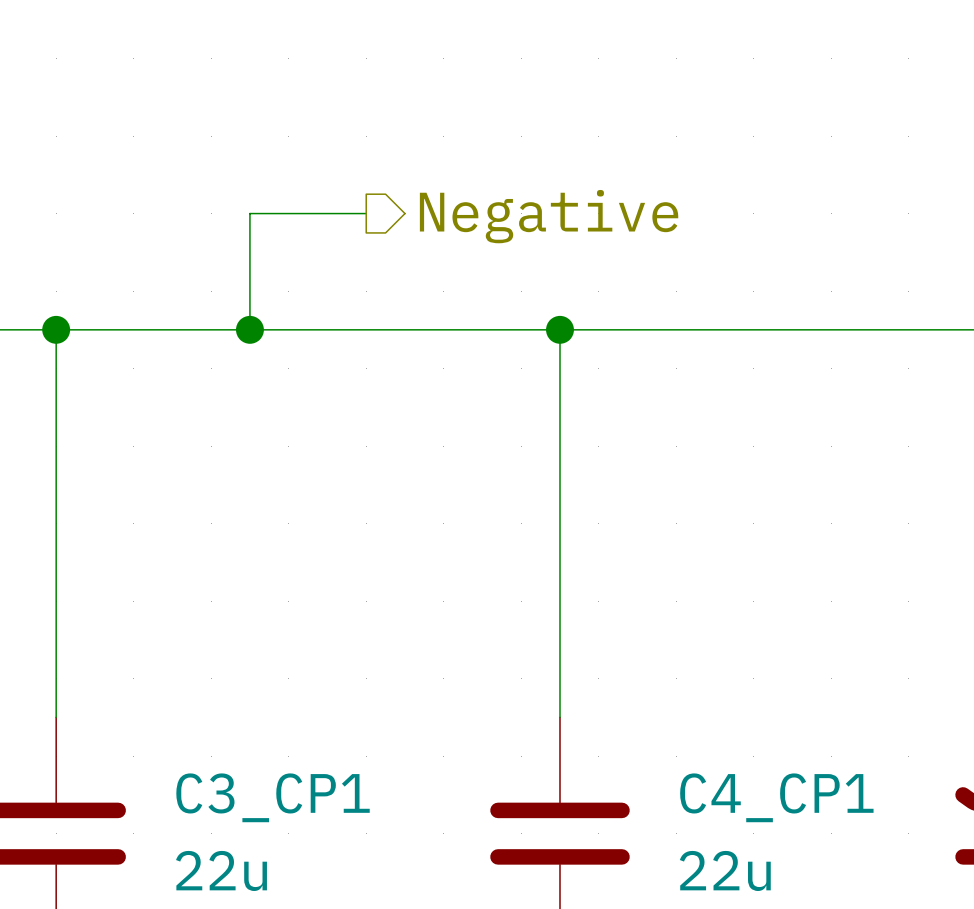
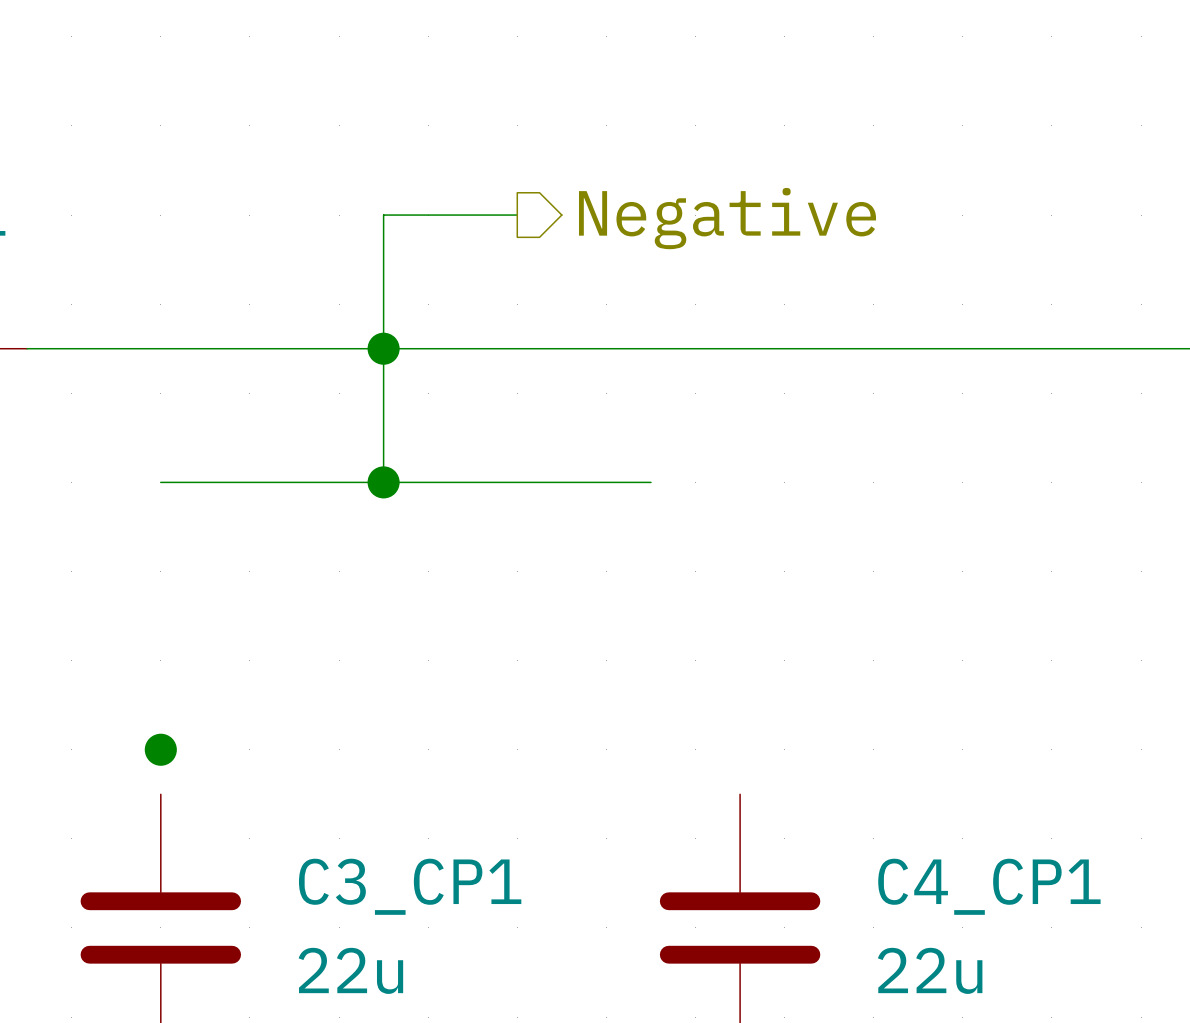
wire: (56, 329) (56, 717) -> none
junction: (56, 329) -> none
wire: none -> (383, 348) (383, 482)
wire: (559, 329) (559, 717) -> none
junction: (559, 329) -> none
wire: none -> (160, 482) (650, 482)
junction: none -> (383, 482)
junction: none -> (160, 749)

